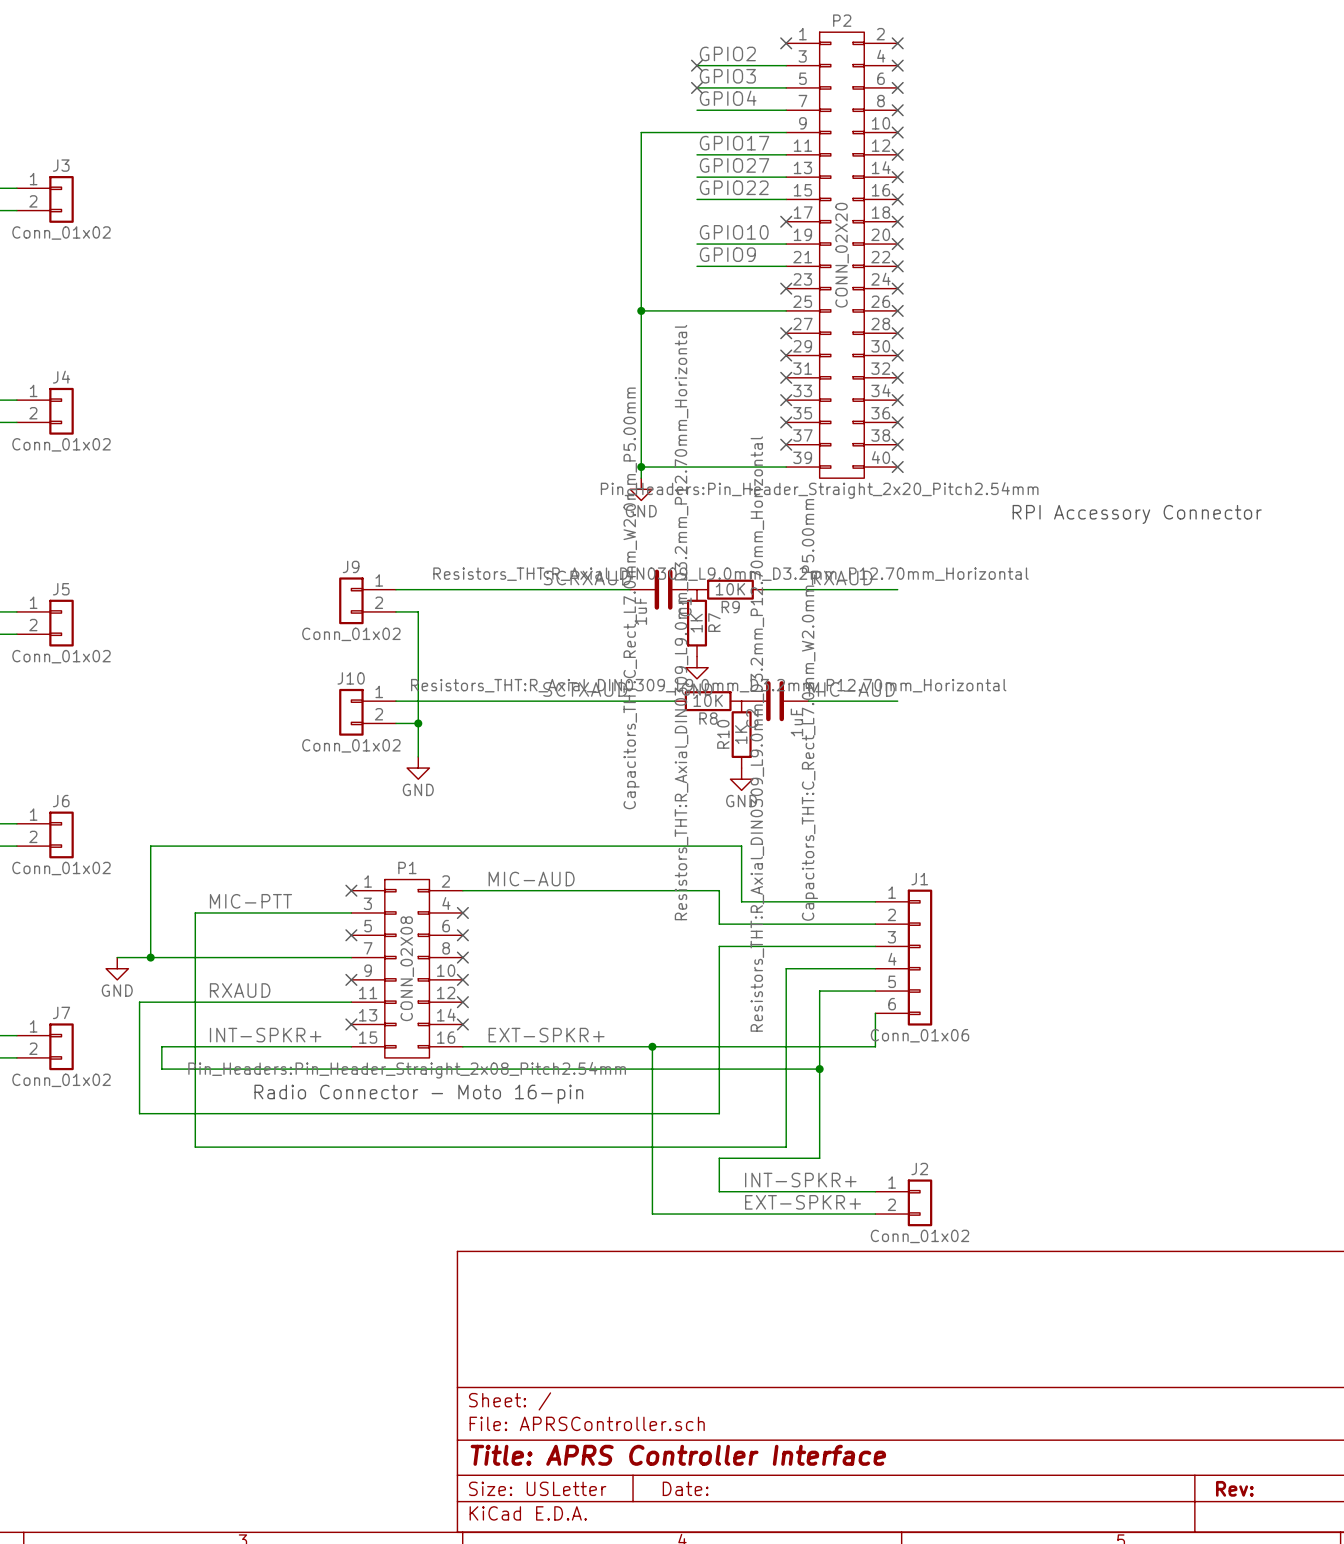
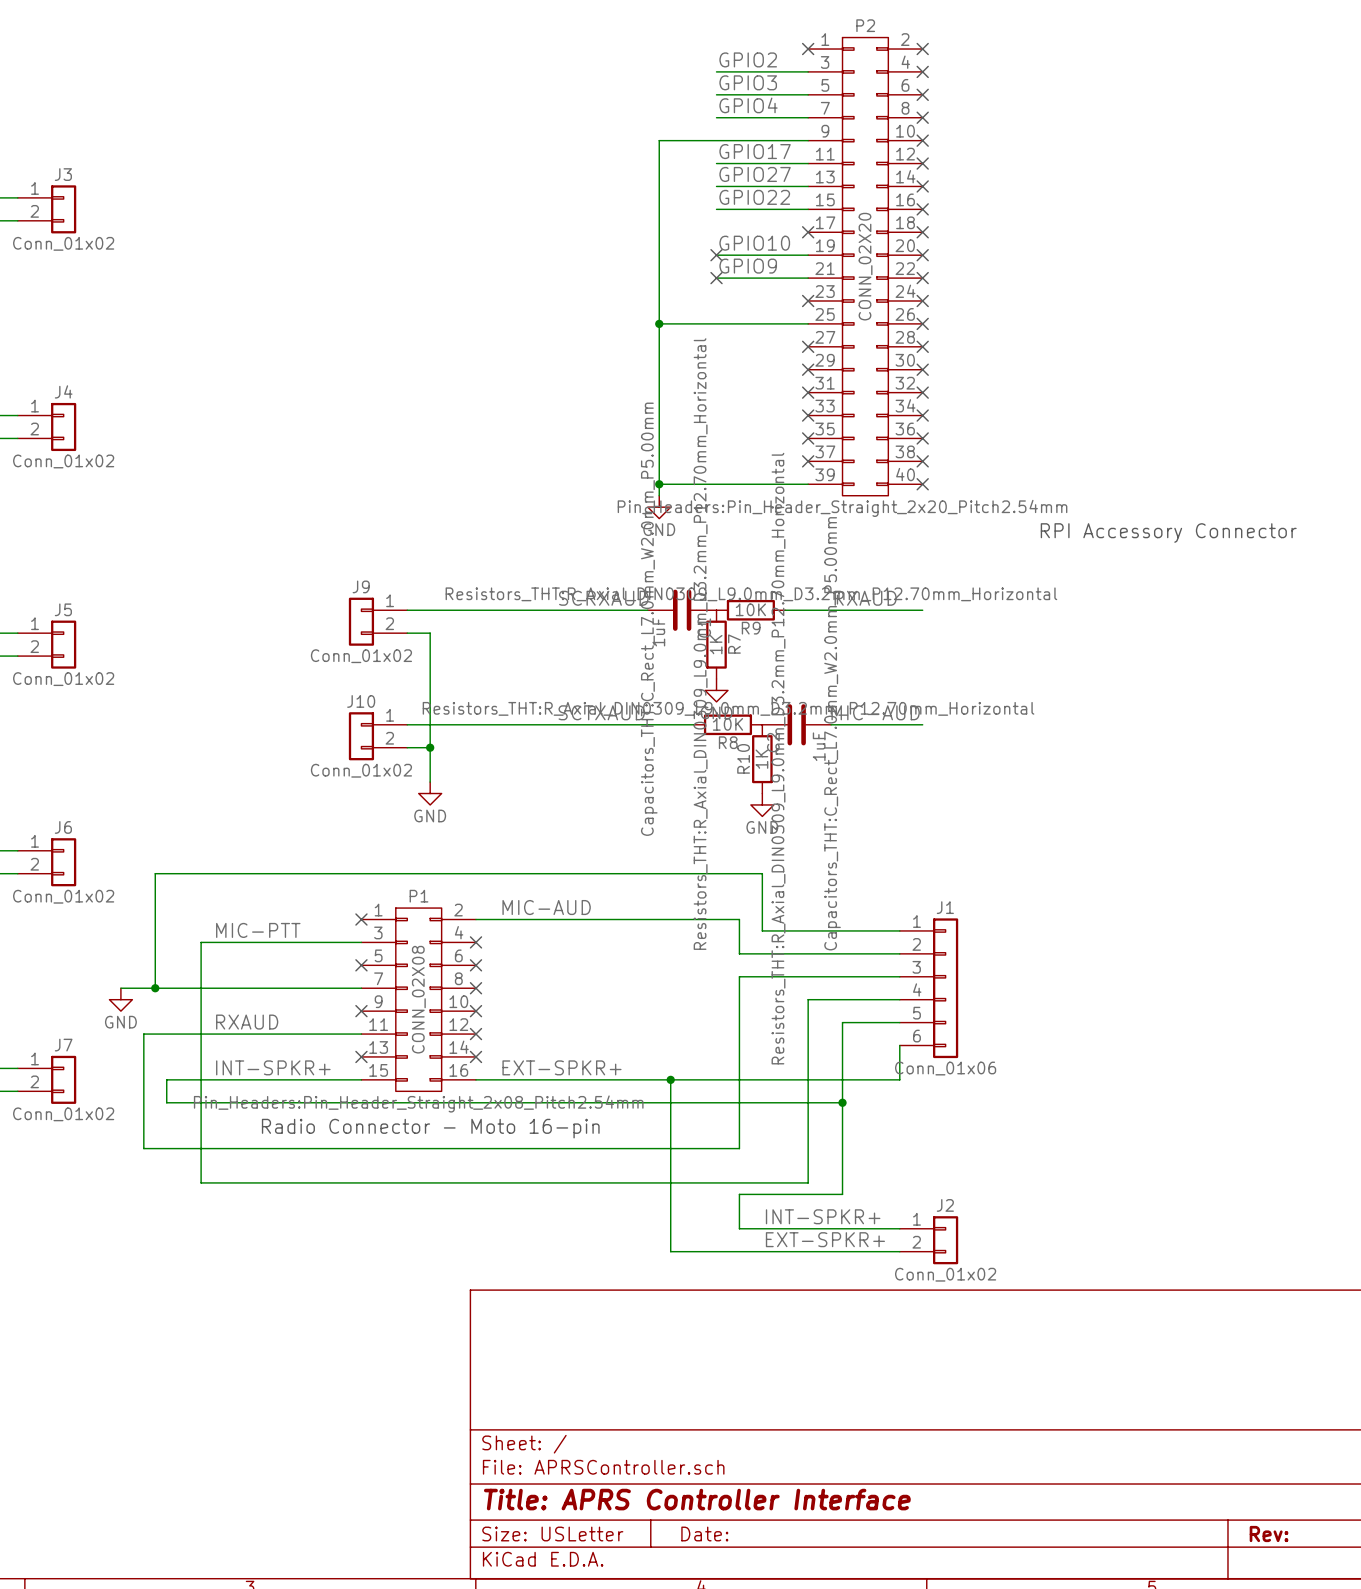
no-connect mark: (697, 65) -> none
no-connect mark: (697, 87) -> none
no-connect mark: none -> (716, 255)
no-connect mark: none -> (716, 278)

